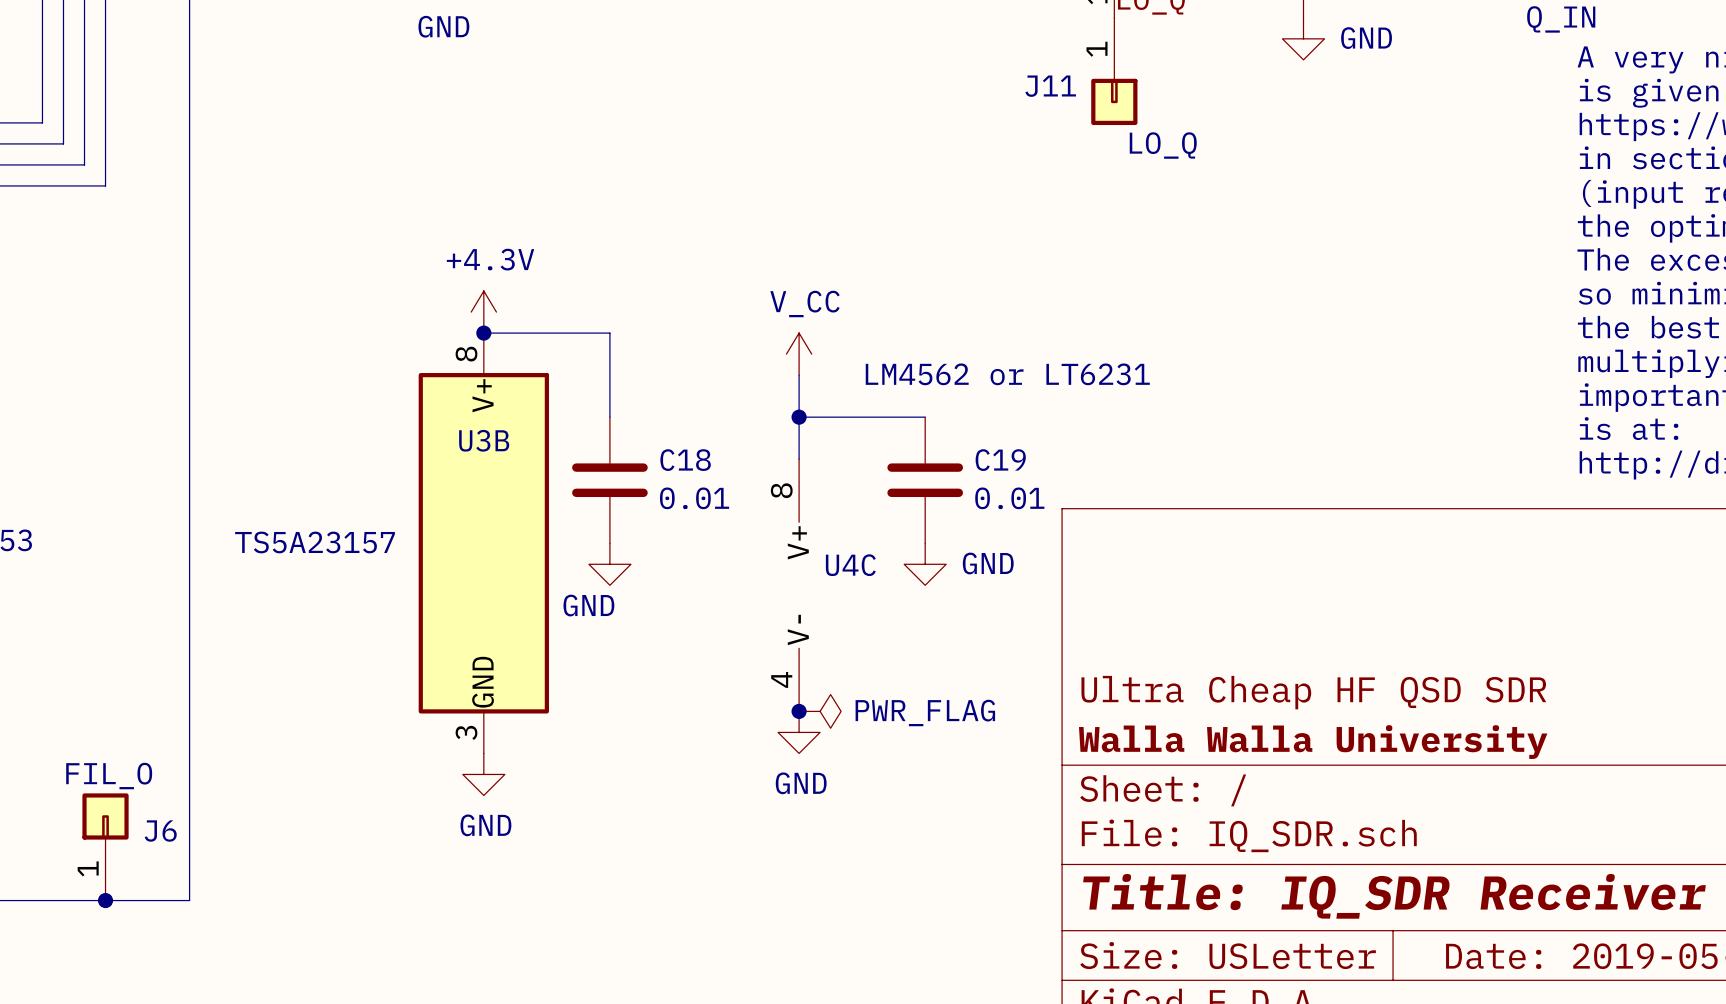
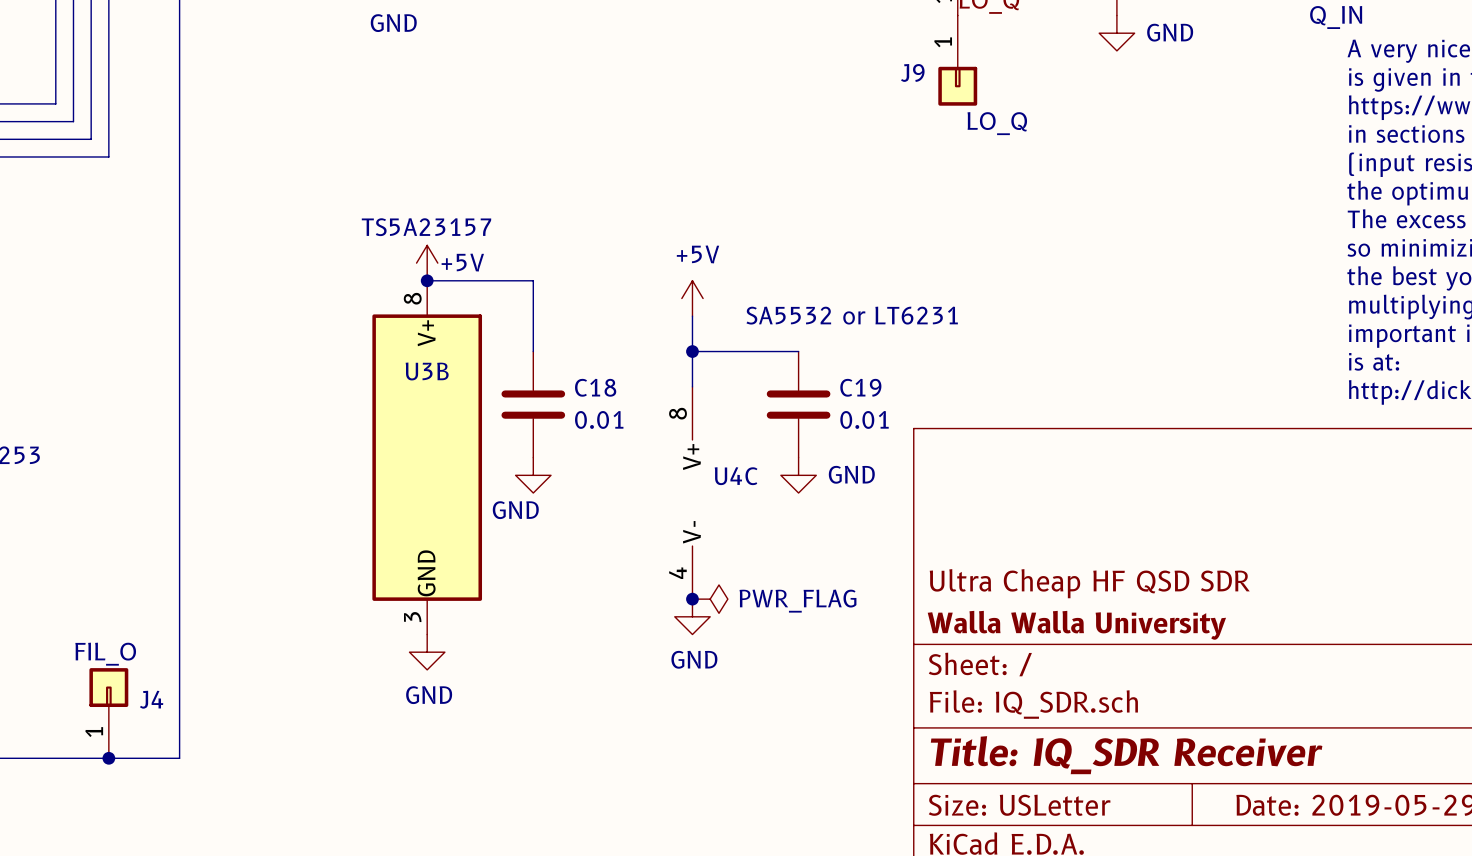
J11 name: J11 (1050, 86) -> J9 (912, 72)
power symbol: +4.3V (483, 312) -> +5V (427, 263)
power symbol: V_CC (799, 354) -> +5V (692, 298)
U4C value: LM4562 or LT6231 (1007, 374) -> SA5532 or LT6231 (852, 315)
U3B value position: TS5A23157 (315, 542) -> TS5A23157 (426, 227)
J6 name: J6 (160, 831) -> J4 (151, 699)

